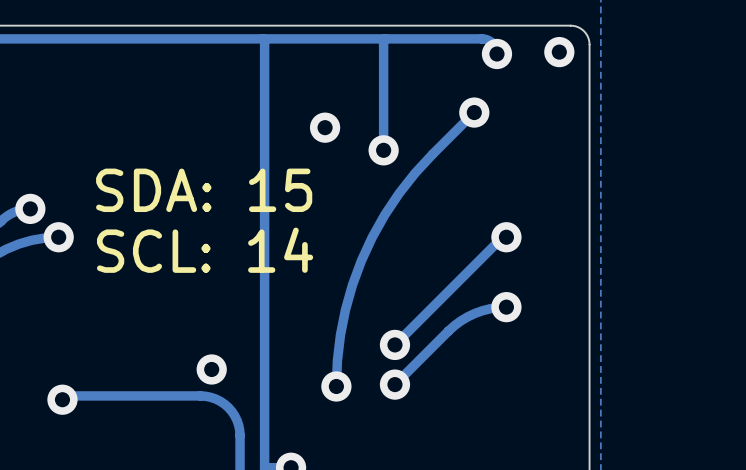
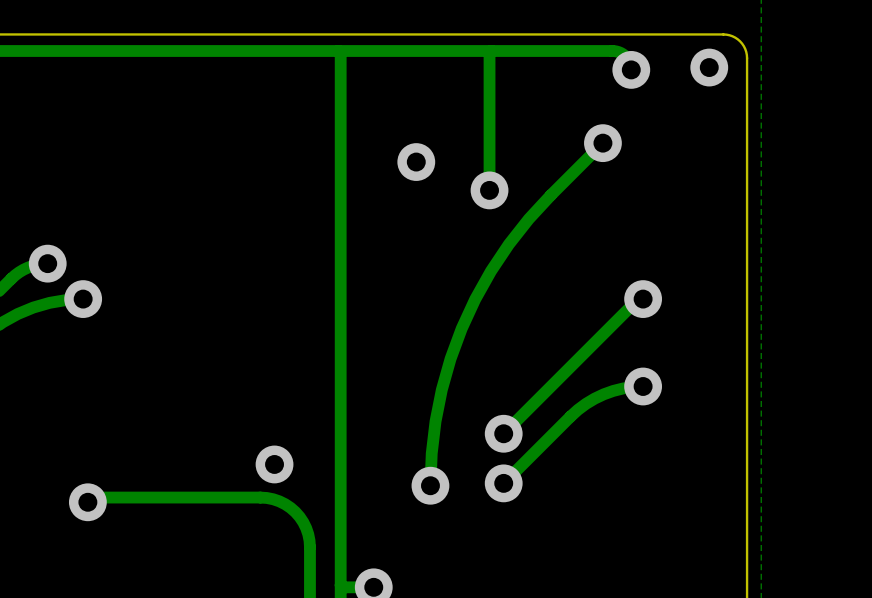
text: SDA: 15 (204, 190) -> none
text: SCL: 14 (205, 250) -> none

